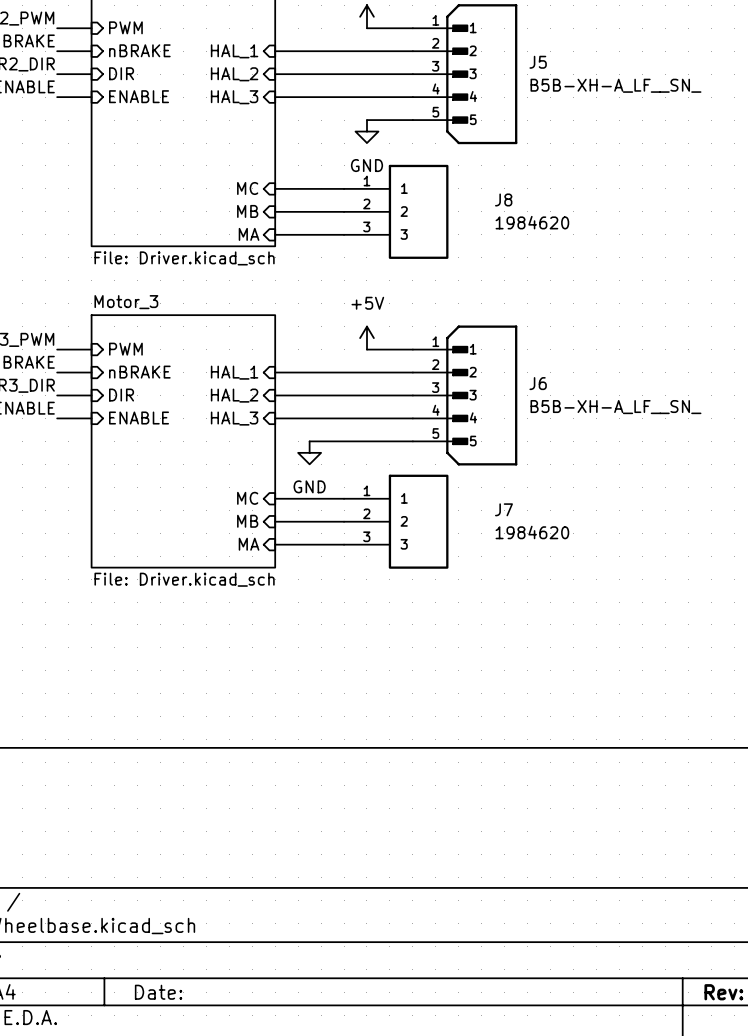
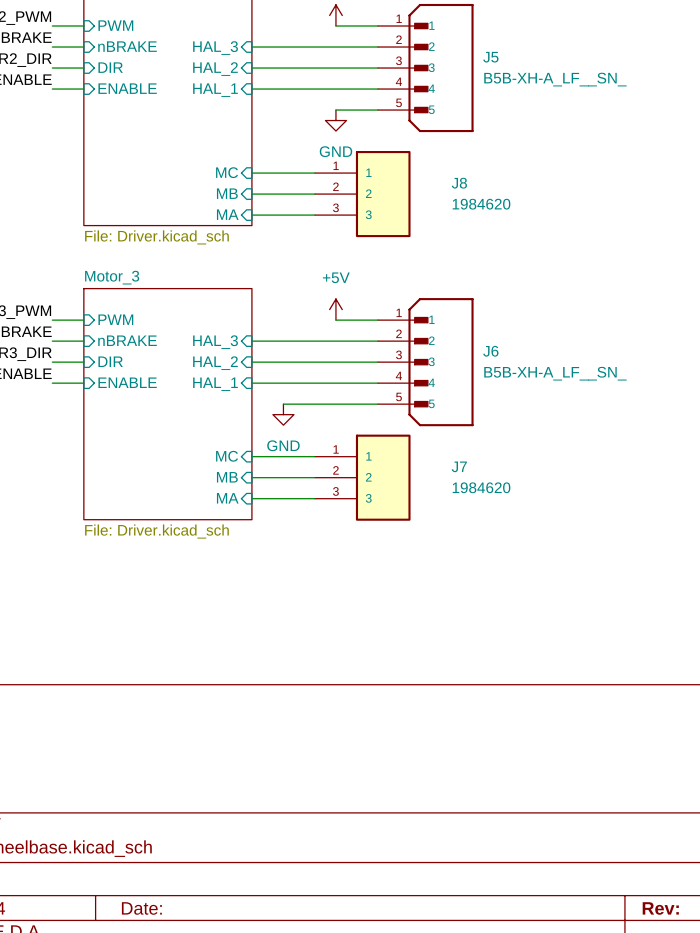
sheet pin: HAL_1 (234, 51) -> HAL_3 (215, 48)
sheet pin: HAL_3 (234, 97) -> HAL_1 (215, 90)
sheet pin: HAL_1 (234, 372) -> HAL_3 (215, 342)
sheet pin: HAL_3 (234, 418) -> HAL_1 (215, 384)

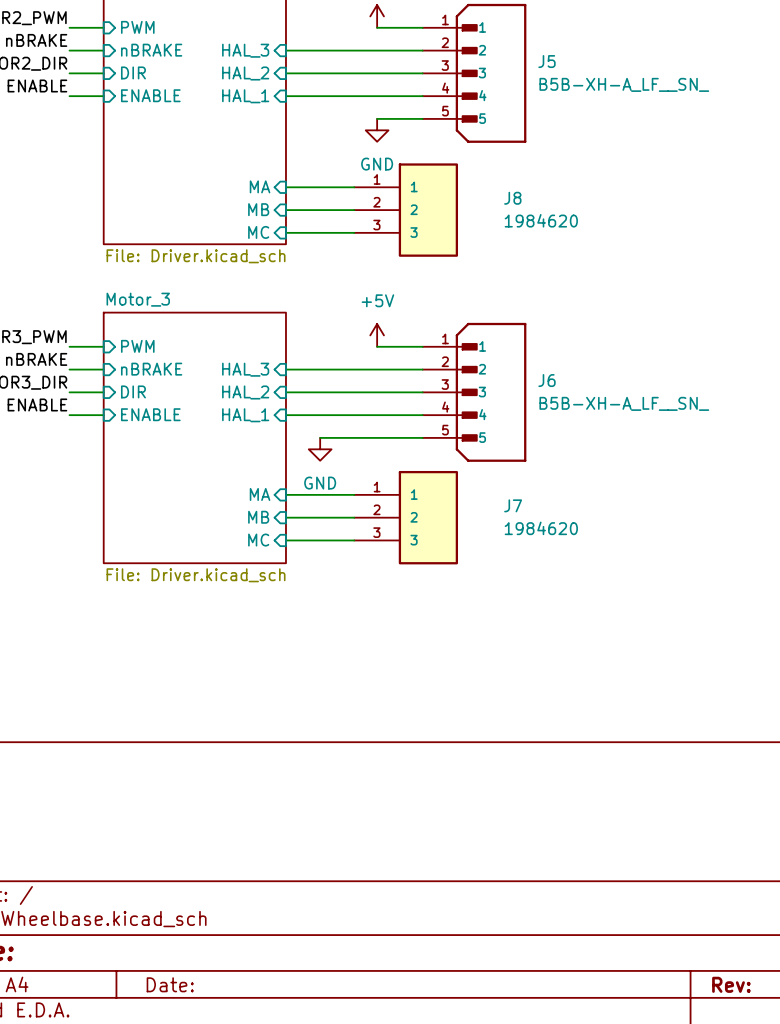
sheet pin: MC (227, 172) -> MA (260, 186)
sheet pin: MA (227, 214) -> MC (258, 232)
sheet pin: MC (227, 456) -> MA (260, 494)
sheet pin: MA (227, 498) -> MC (258, 540)

